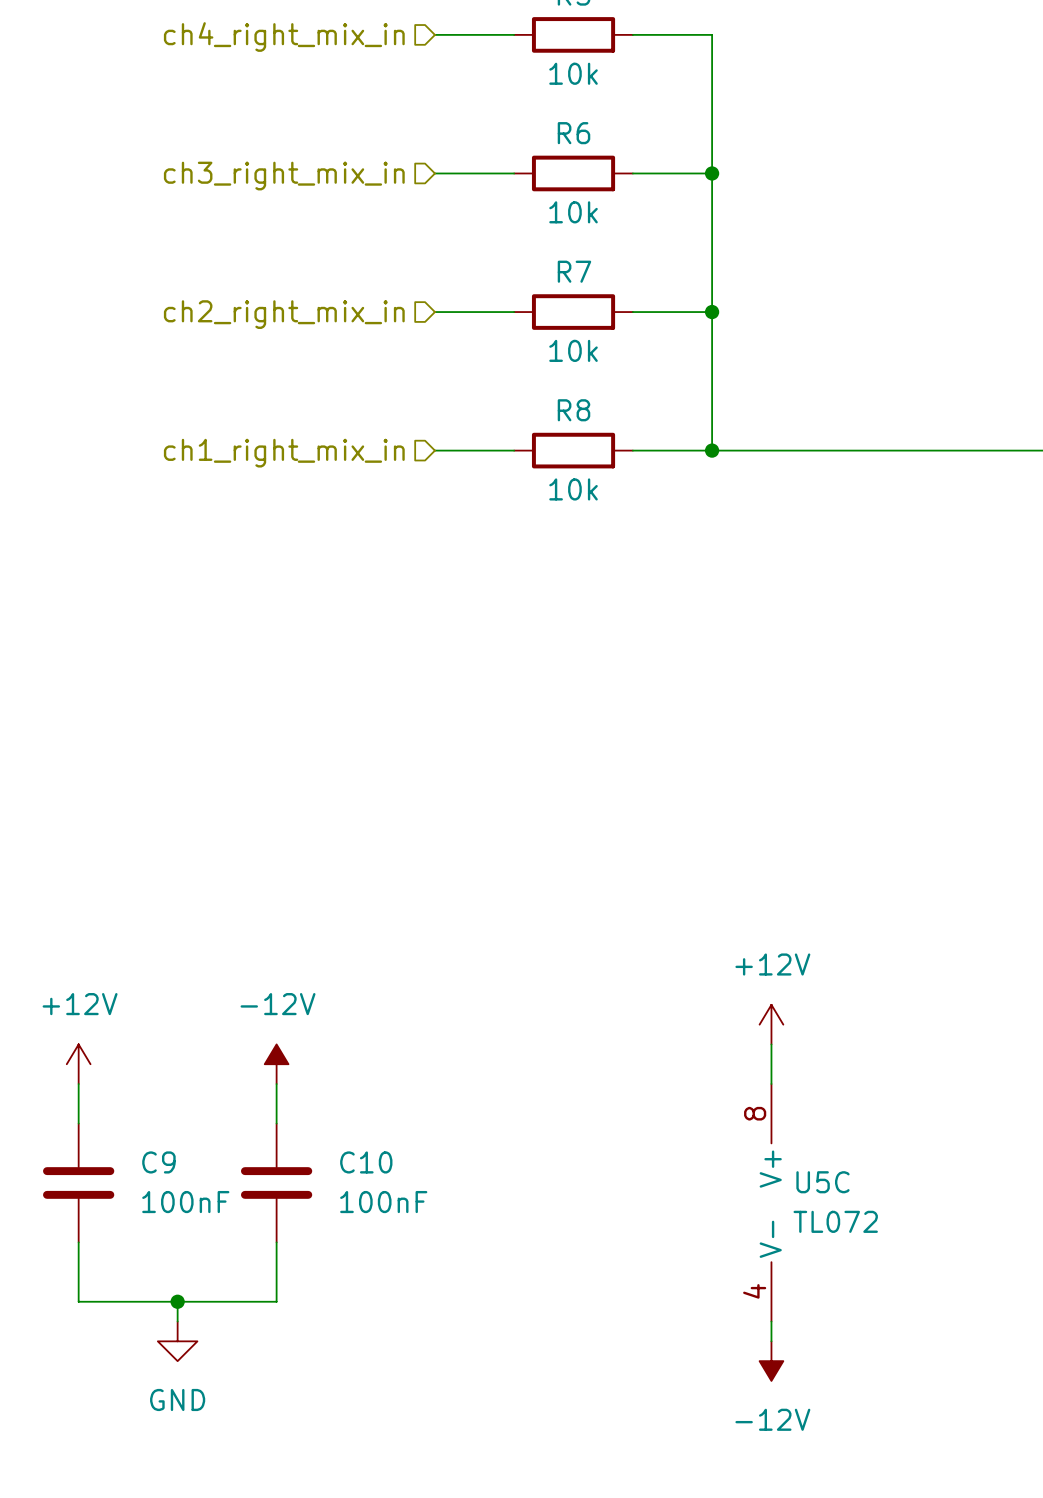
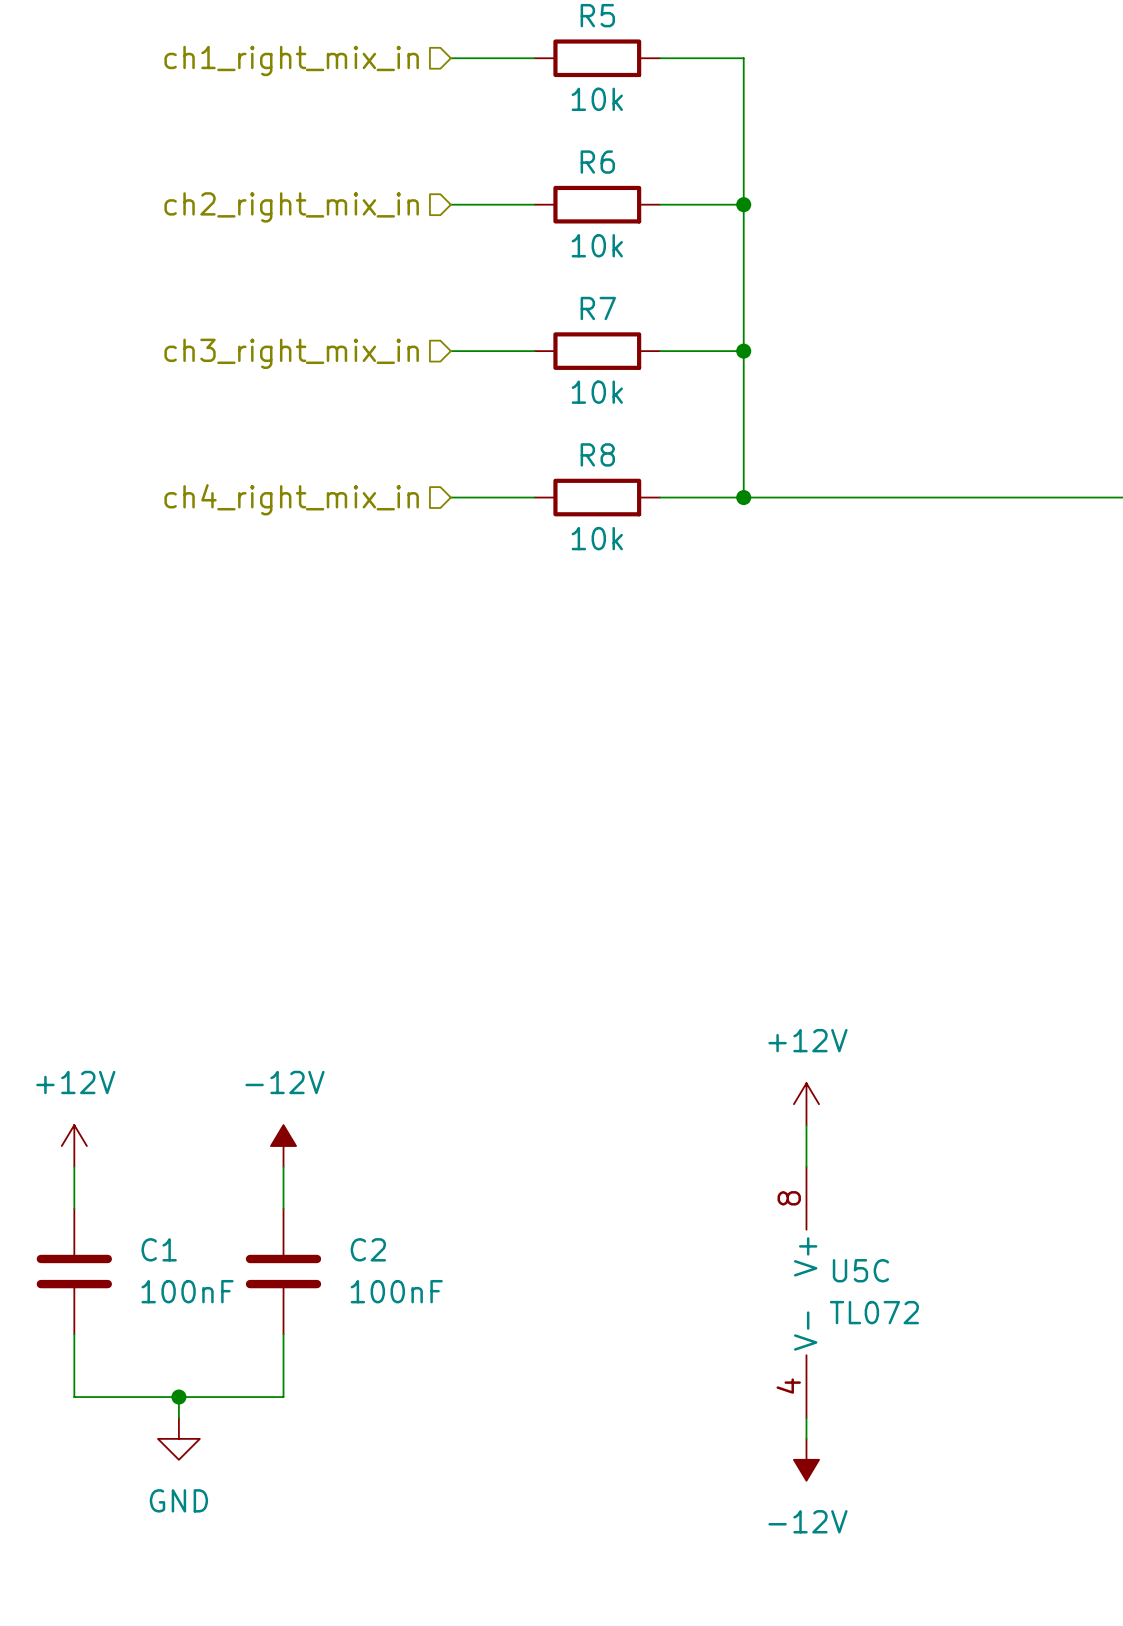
hierarchical label: ch4_right_mix_in (284, 37) -> ch1_right_mix_in (291, 60)
hierarchical label: ch3_right_mix_in (284, 176) -> ch2_right_mix_in (291, 207)
hierarchical label: ch2_right_mix_in (284, 314) -> ch3_right_mix_in (291, 353)
hierarchical label: ch1_right_mix_in (284, 453) -> ch4_right_mix_in (291, 499)
C9 name: C9 (158, 1162) -> C1 (159, 1249)
C10 name: C10 (366, 1162) -> C2 (368, 1249)

